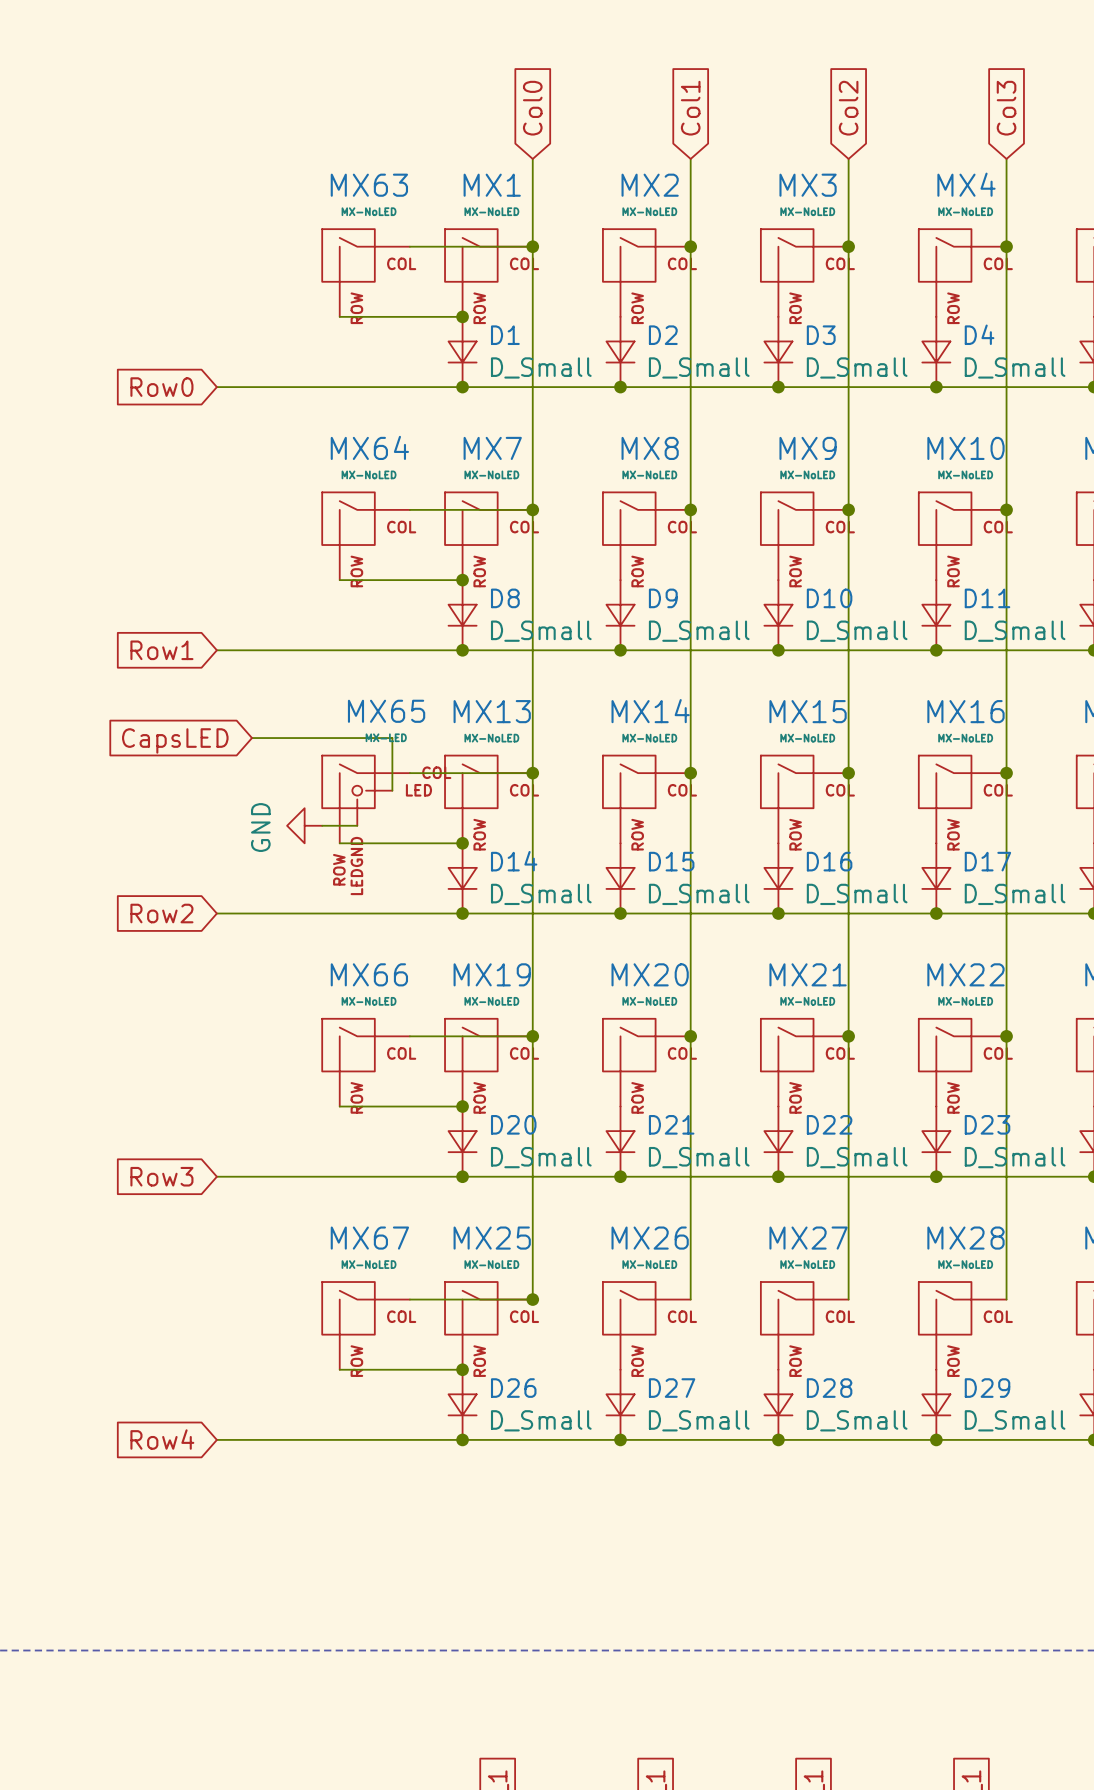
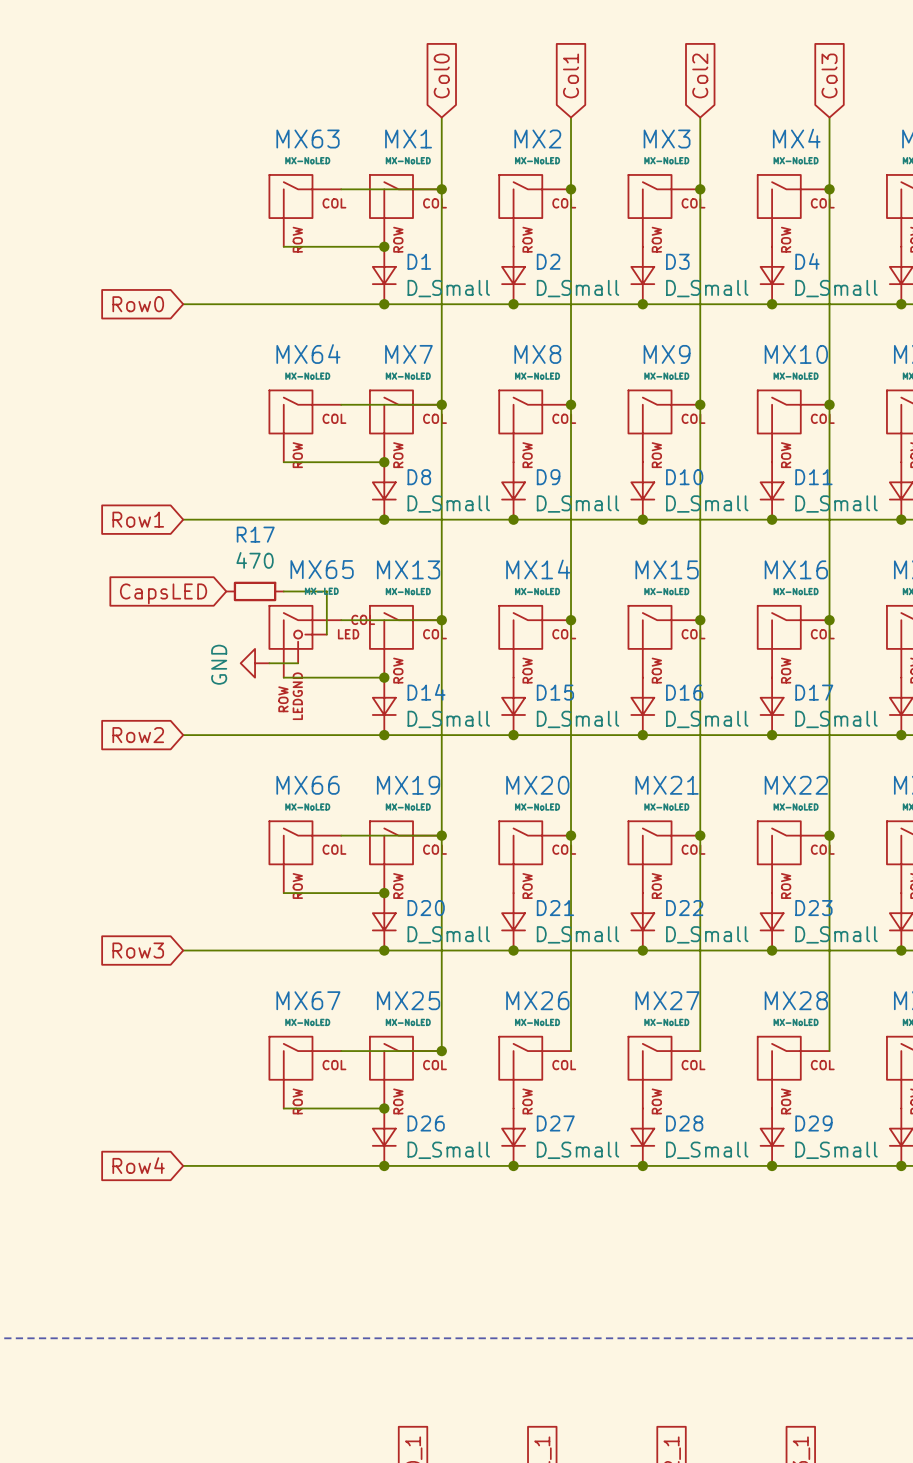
wire: (252, 738) (339, 738) -> none
R17: none -> 470 (255, 591)
global label position: CapsLED (175, 740) -> CapsLED (163, 593)

